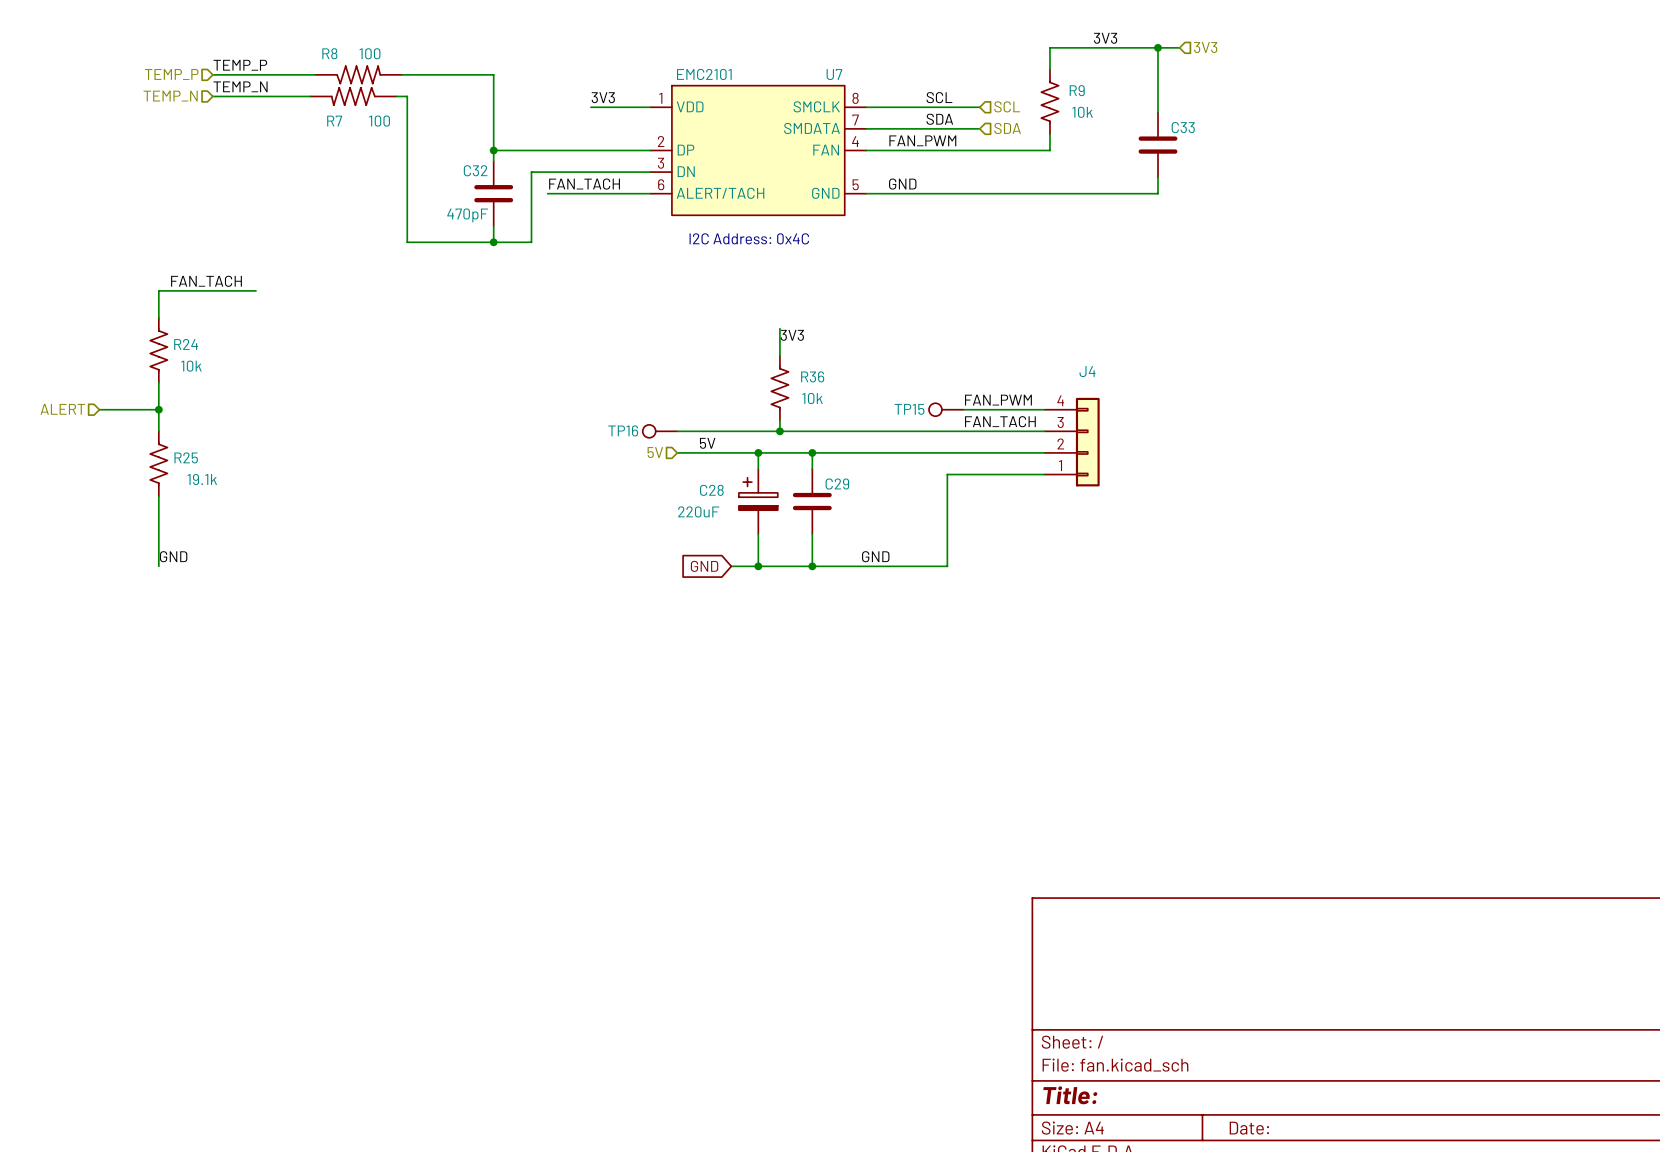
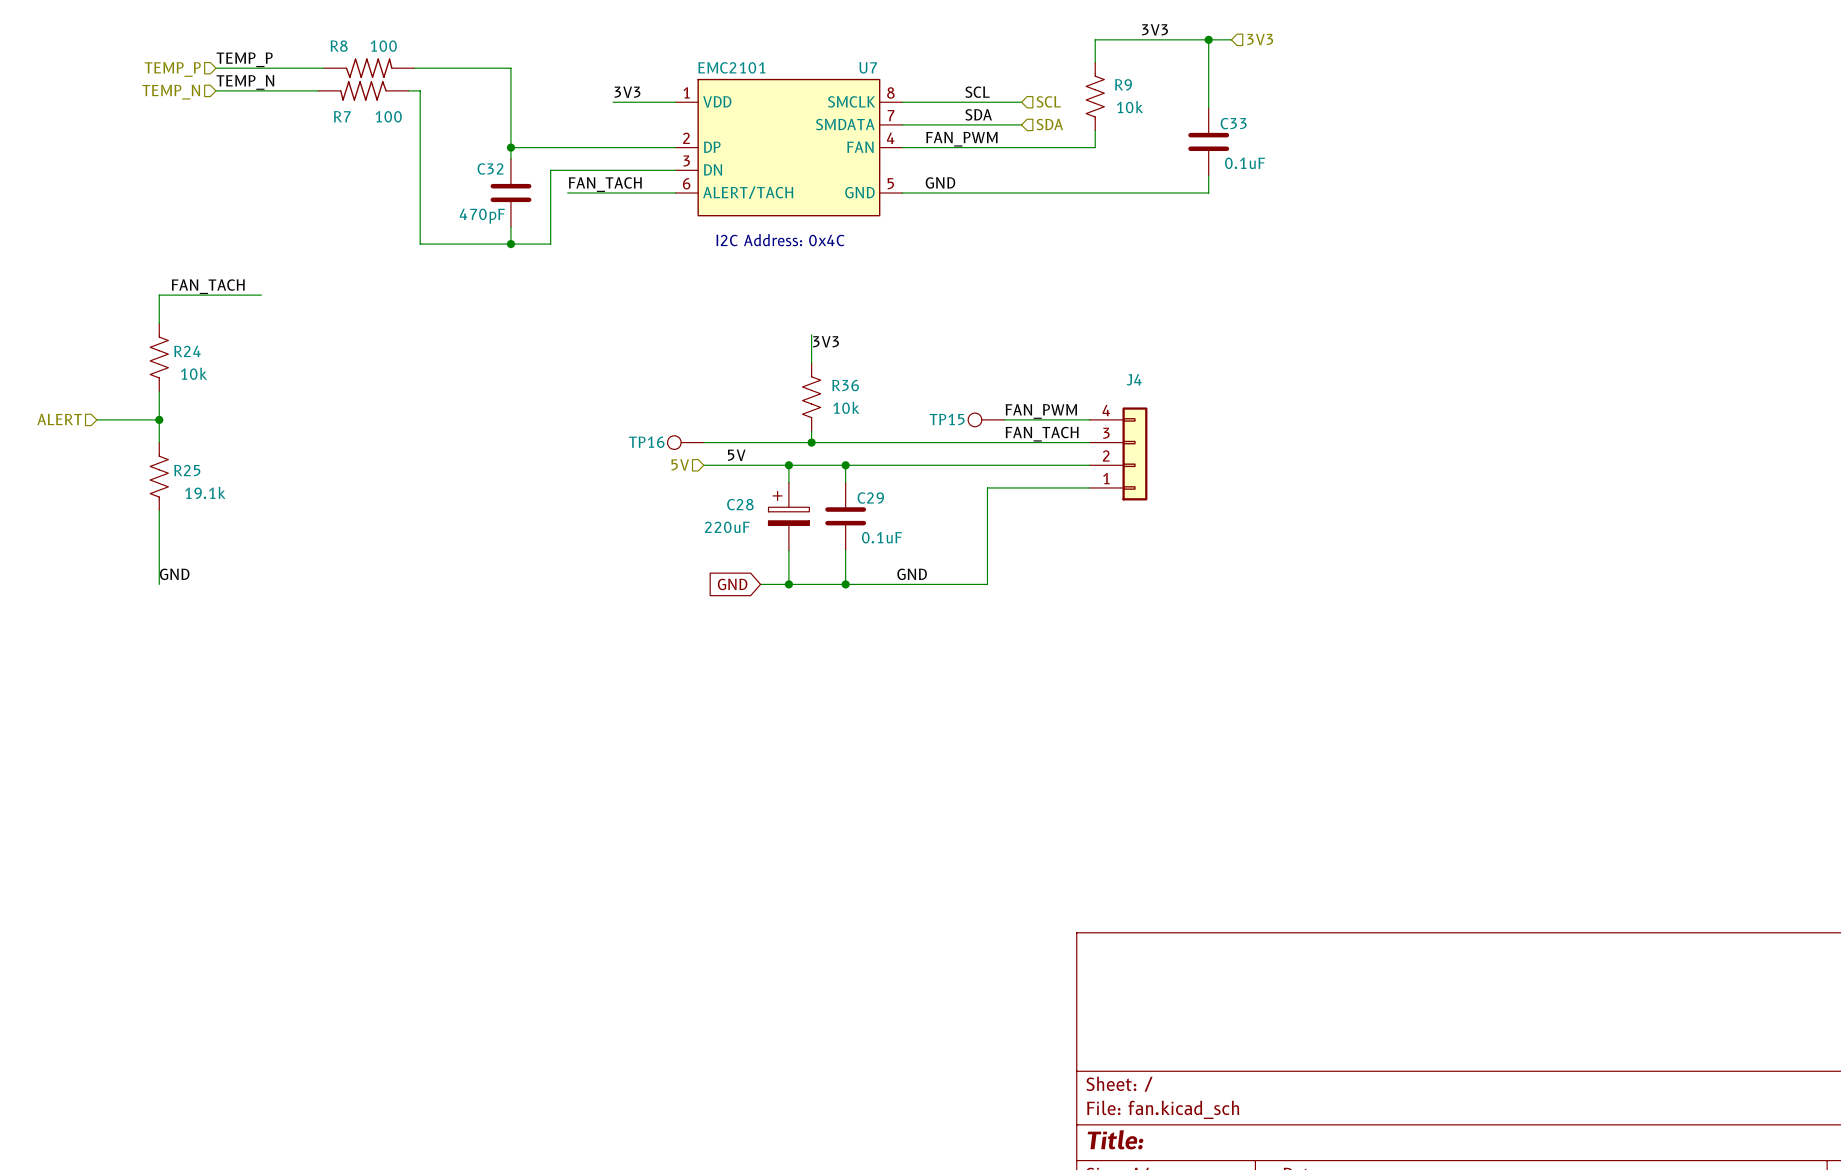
C33 value: none -> 0.1uF (1245, 163)
C29 value: none -> 0.1uF (881, 537)

